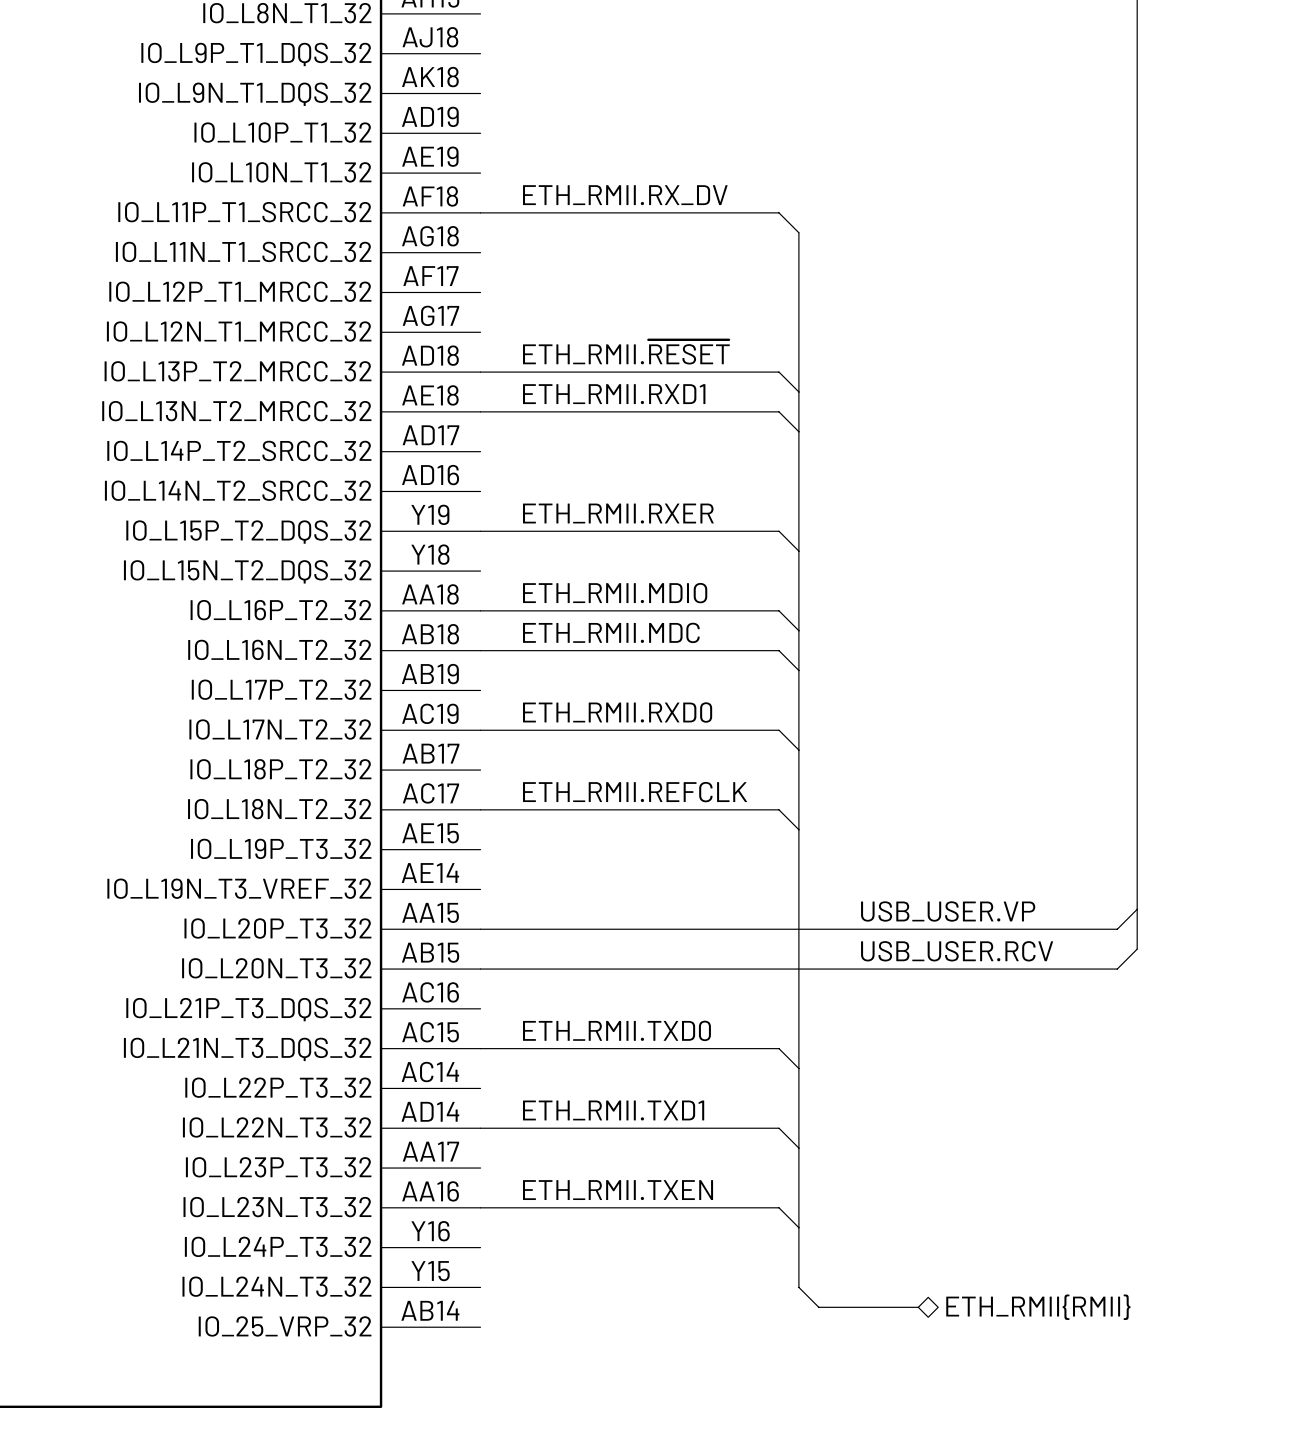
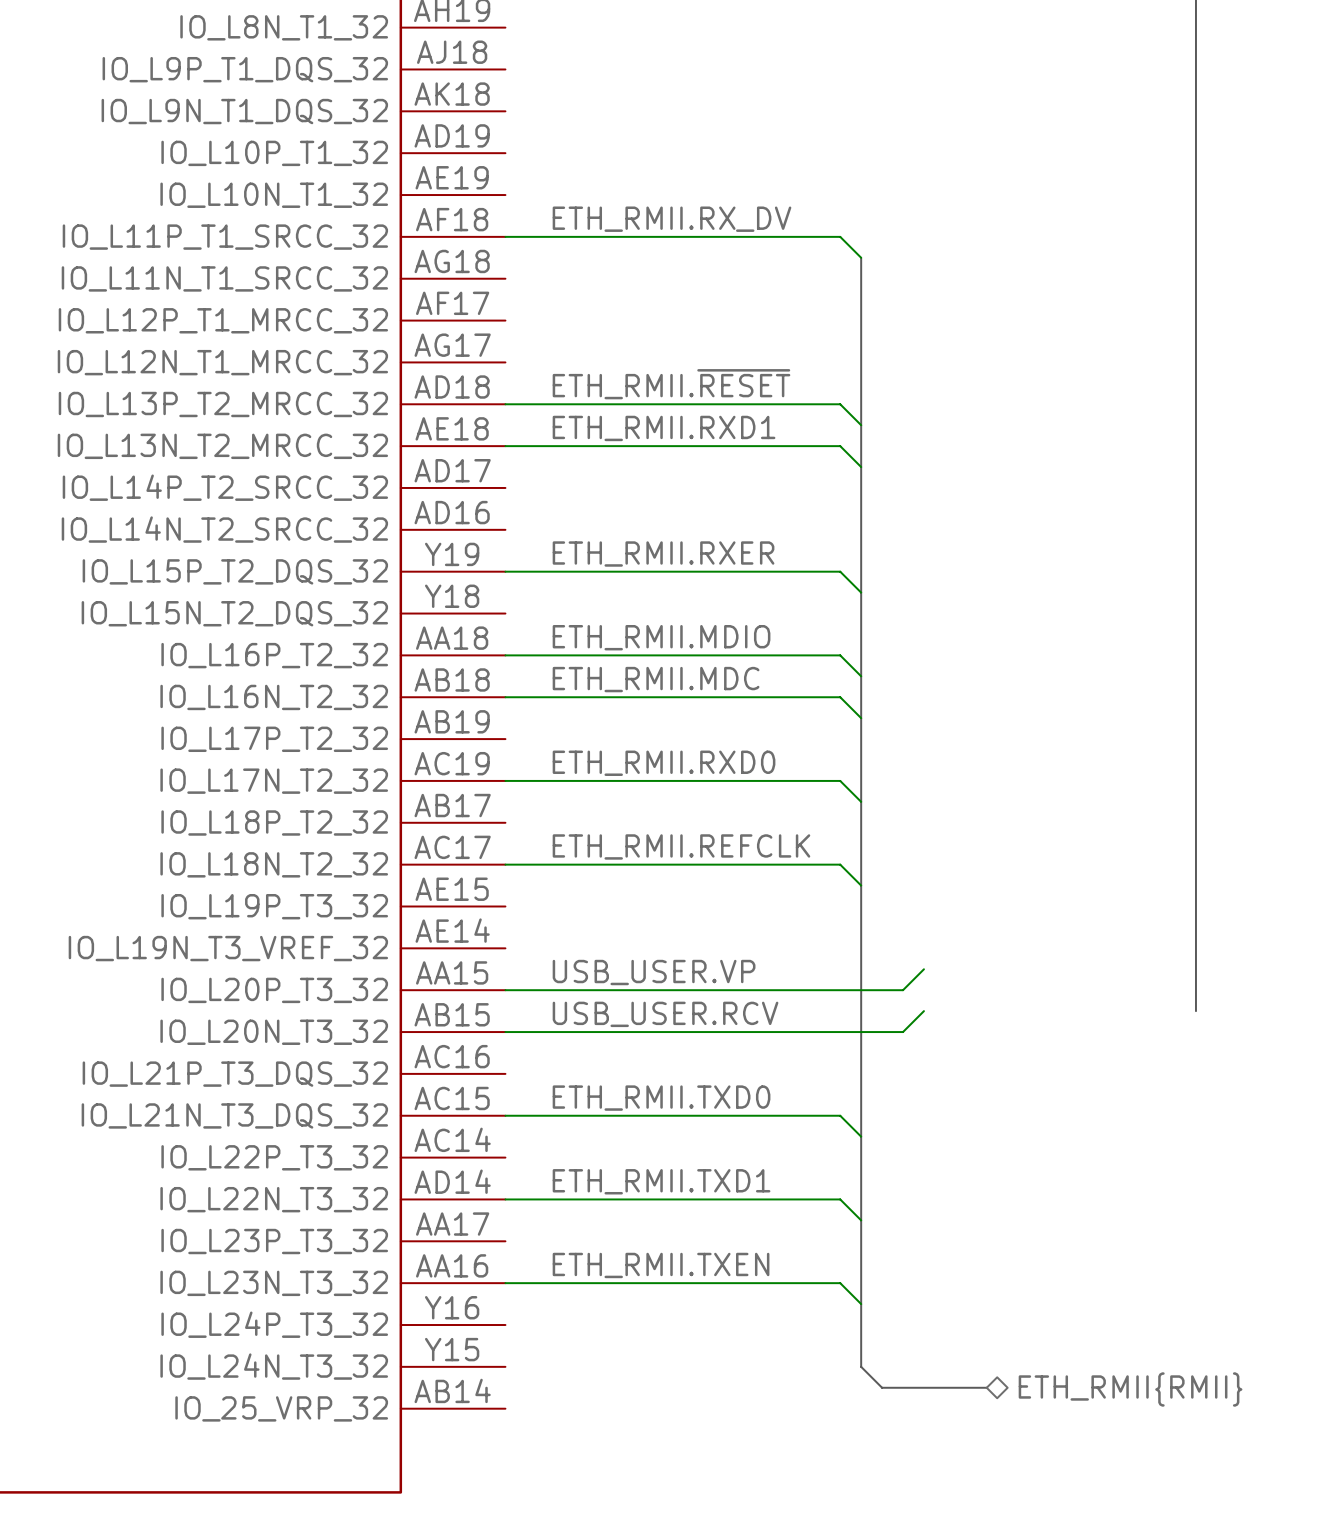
wire: (779, 212) (798, 232) -> (819, 236) (840, 236) (861, 257)
bus: (798, 232) (798, 1287) (818, 1307) (838, 1307) -> (861, 257) (861, 1366) (882, 1387)
wire: (779, 372) (798, 391) -> (819, 404) (840, 404) (861, 425)
wire: (779, 411) (798, 431) -> (819, 446) (840, 446) (861, 467)
wire: (779, 531) (798, 551) -> (819, 571) (840, 571) (861, 592)
wire: (779, 610) (798, 630) -> (819, 655) (840, 655) (861, 676)
wire: (779, 650) (798, 670) -> (819, 697) (840, 697) (861, 718)
wire: (779, 730) (798, 750) -> (819, 780) (840, 780) (861, 801)
wire: (779, 809) (798, 829) -> (819, 864) (840, 864) (861, 885)
wire: (1137, 909) (1117, 929) (858, 929) -> (923, 969) (903, 990)
label position: USB_USER.VP (948, 911) -> USB_USER.VP (654, 972)
wire: (1137, 949) (1117, 969) (858, 969) -> (923, 1011) (903, 1032)
label position: USB_USER.RCV (957, 951) -> USB_USER.RCV (665, 1014)
wire: (779, 1048) (798, 1068) -> (819, 1115) (840, 1115) (861, 1136)
wire: (779, 1128) (798, 1148) -> (819, 1199) (840, 1199) (861, 1220)
wire: (779, 1207) (798, 1227) -> (819, 1283) (840, 1283) (861, 1304)
bus: none -> (965, 1387) (986, 1387)
hierarchical label position: ETH_RMII{RMII} (1038, 1307) -> ETH_RMII{RMII} (1130, 1389)

